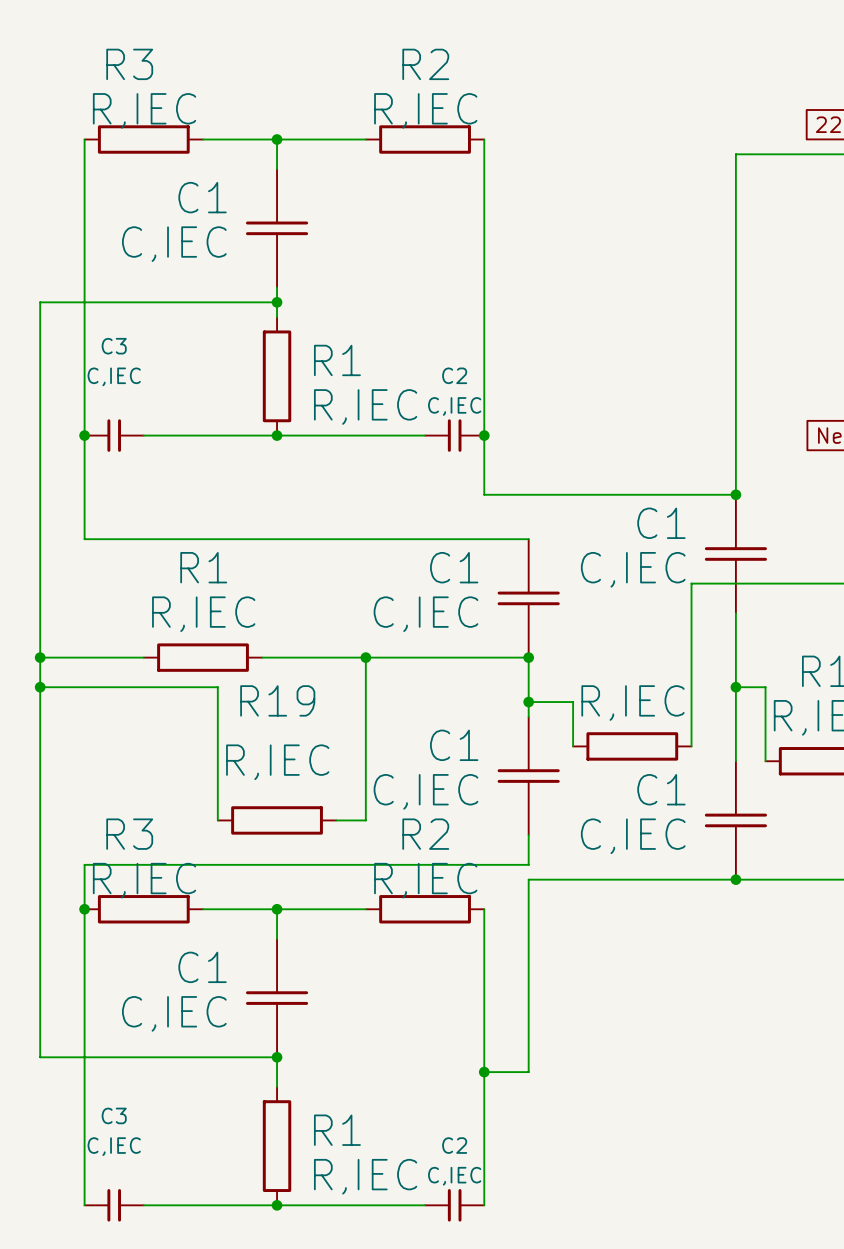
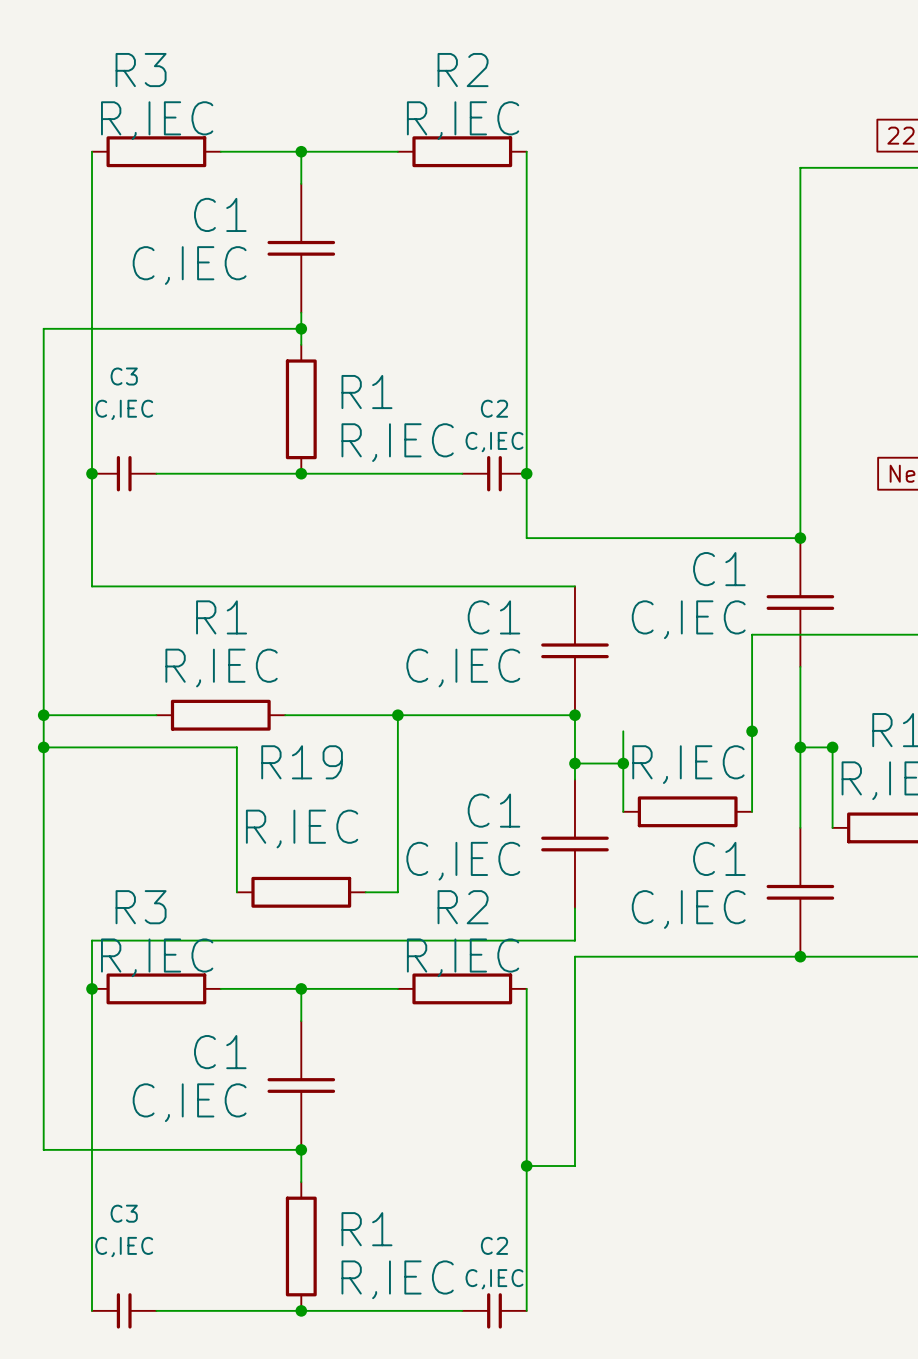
wire: none -> (623, 731) (623, 763)
junction: none -> (752, 731)
junction: none -> (832, 747)
junction: none -> (623, 763)

